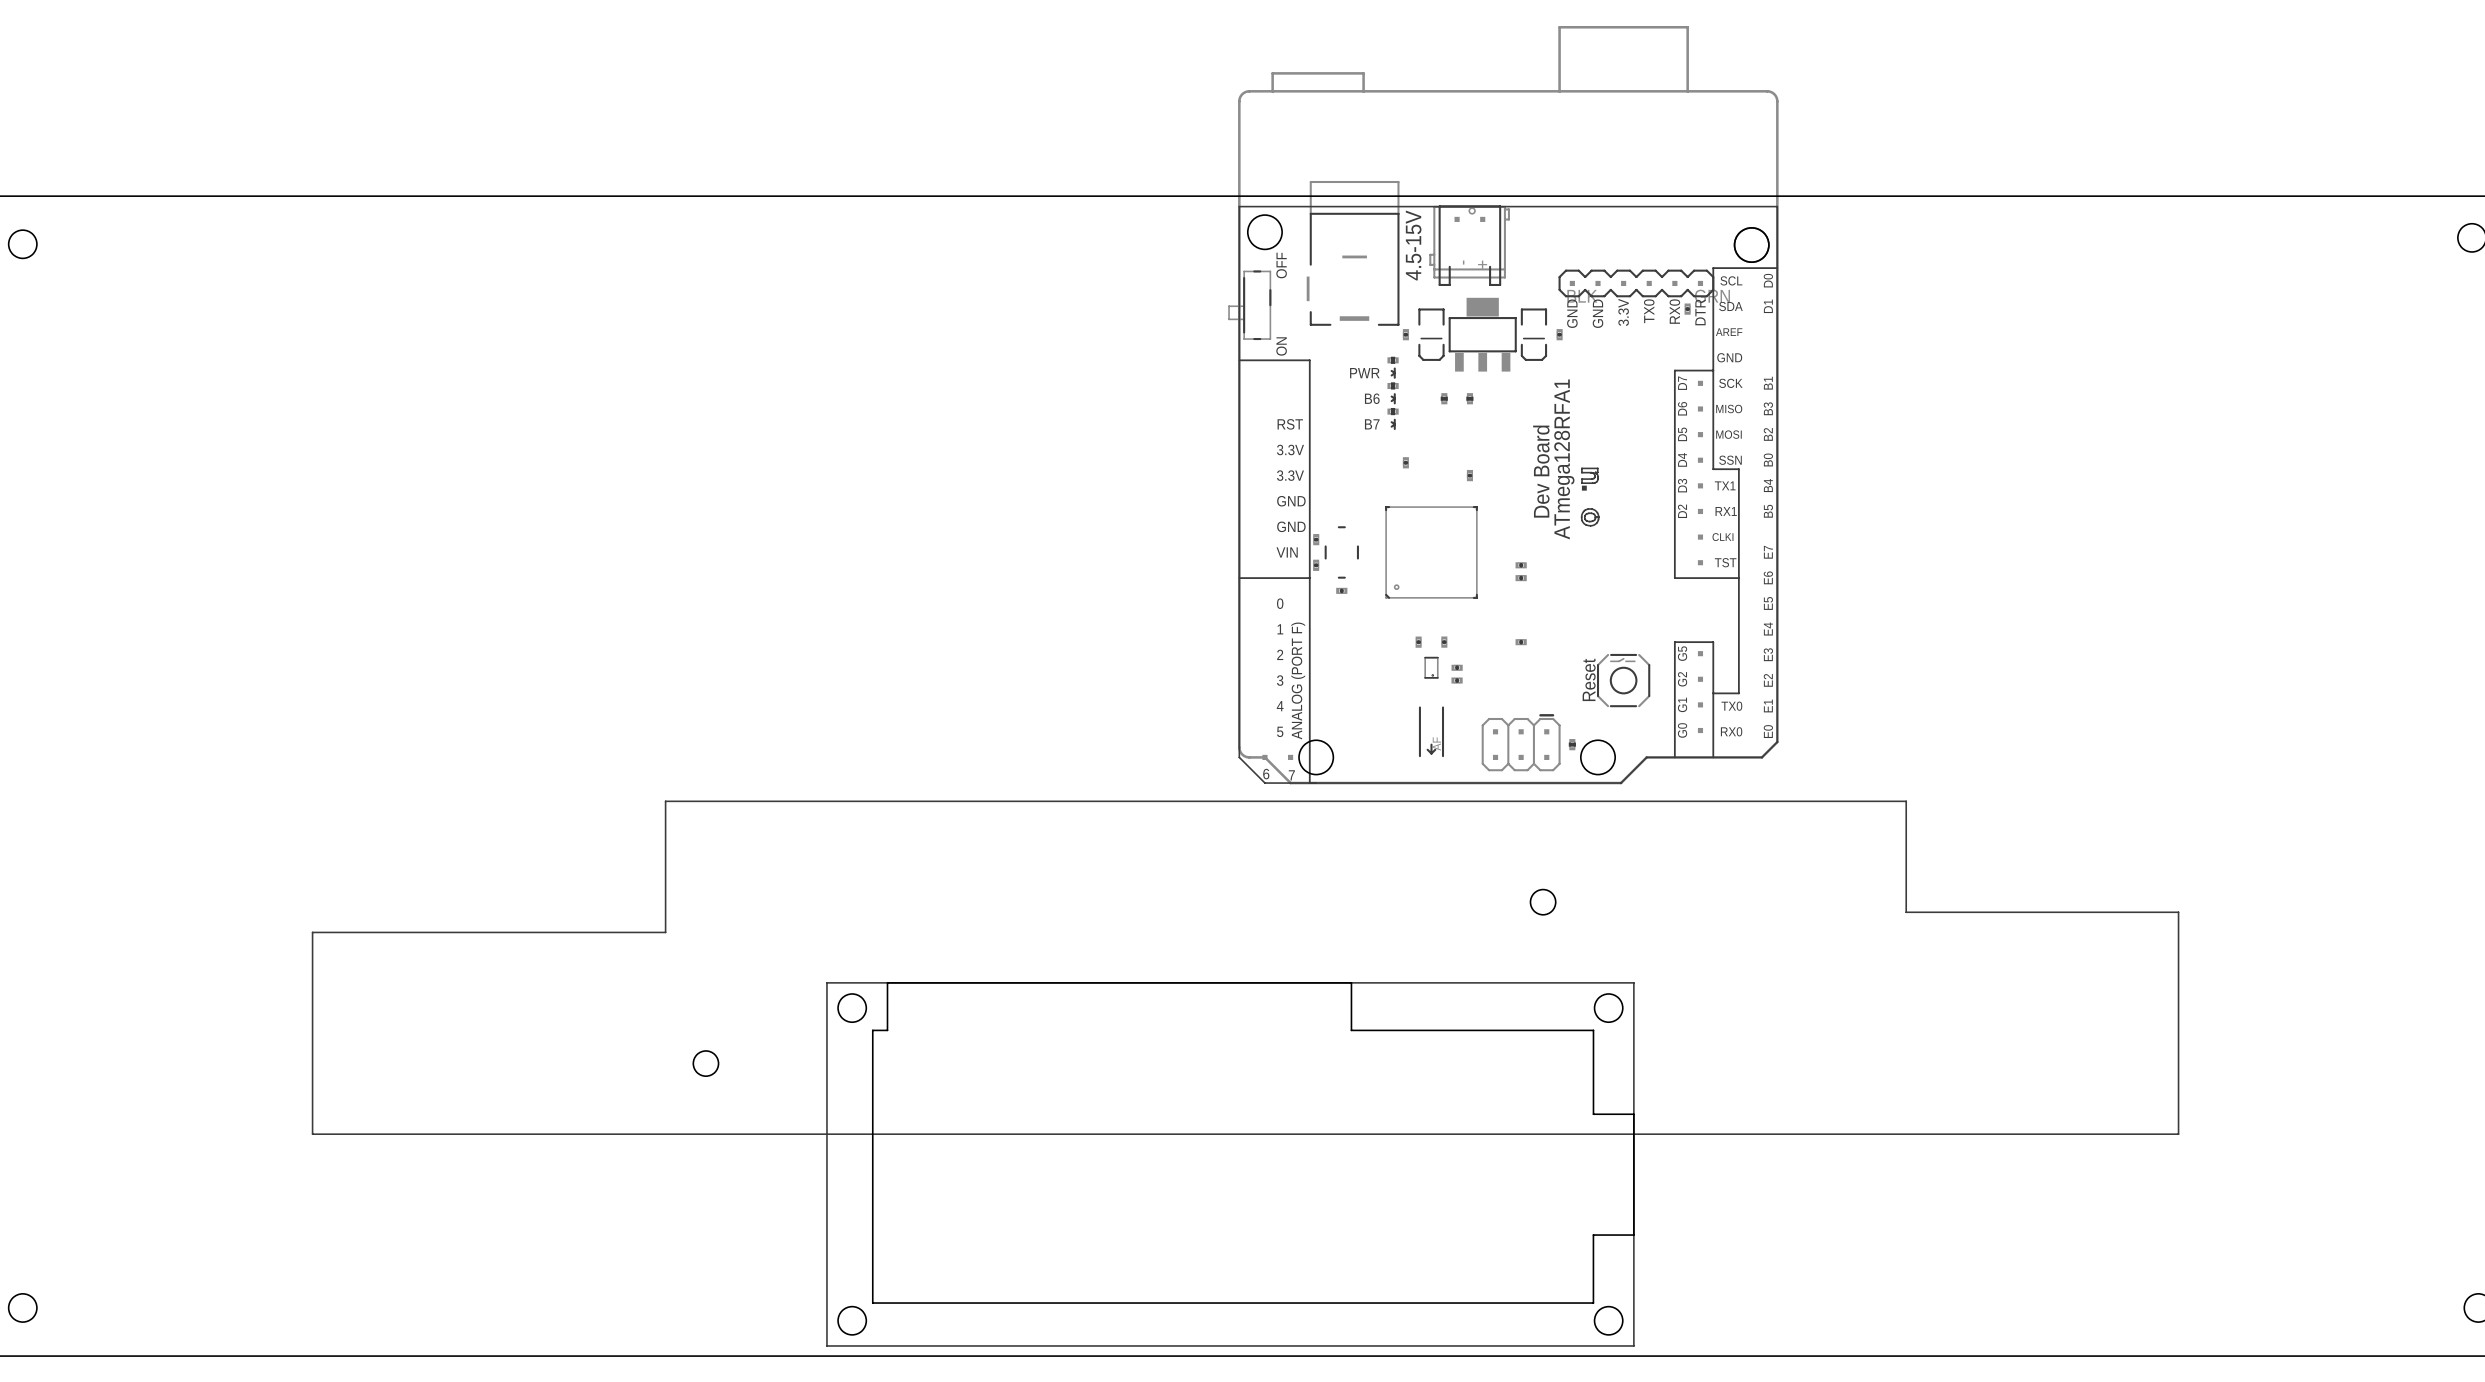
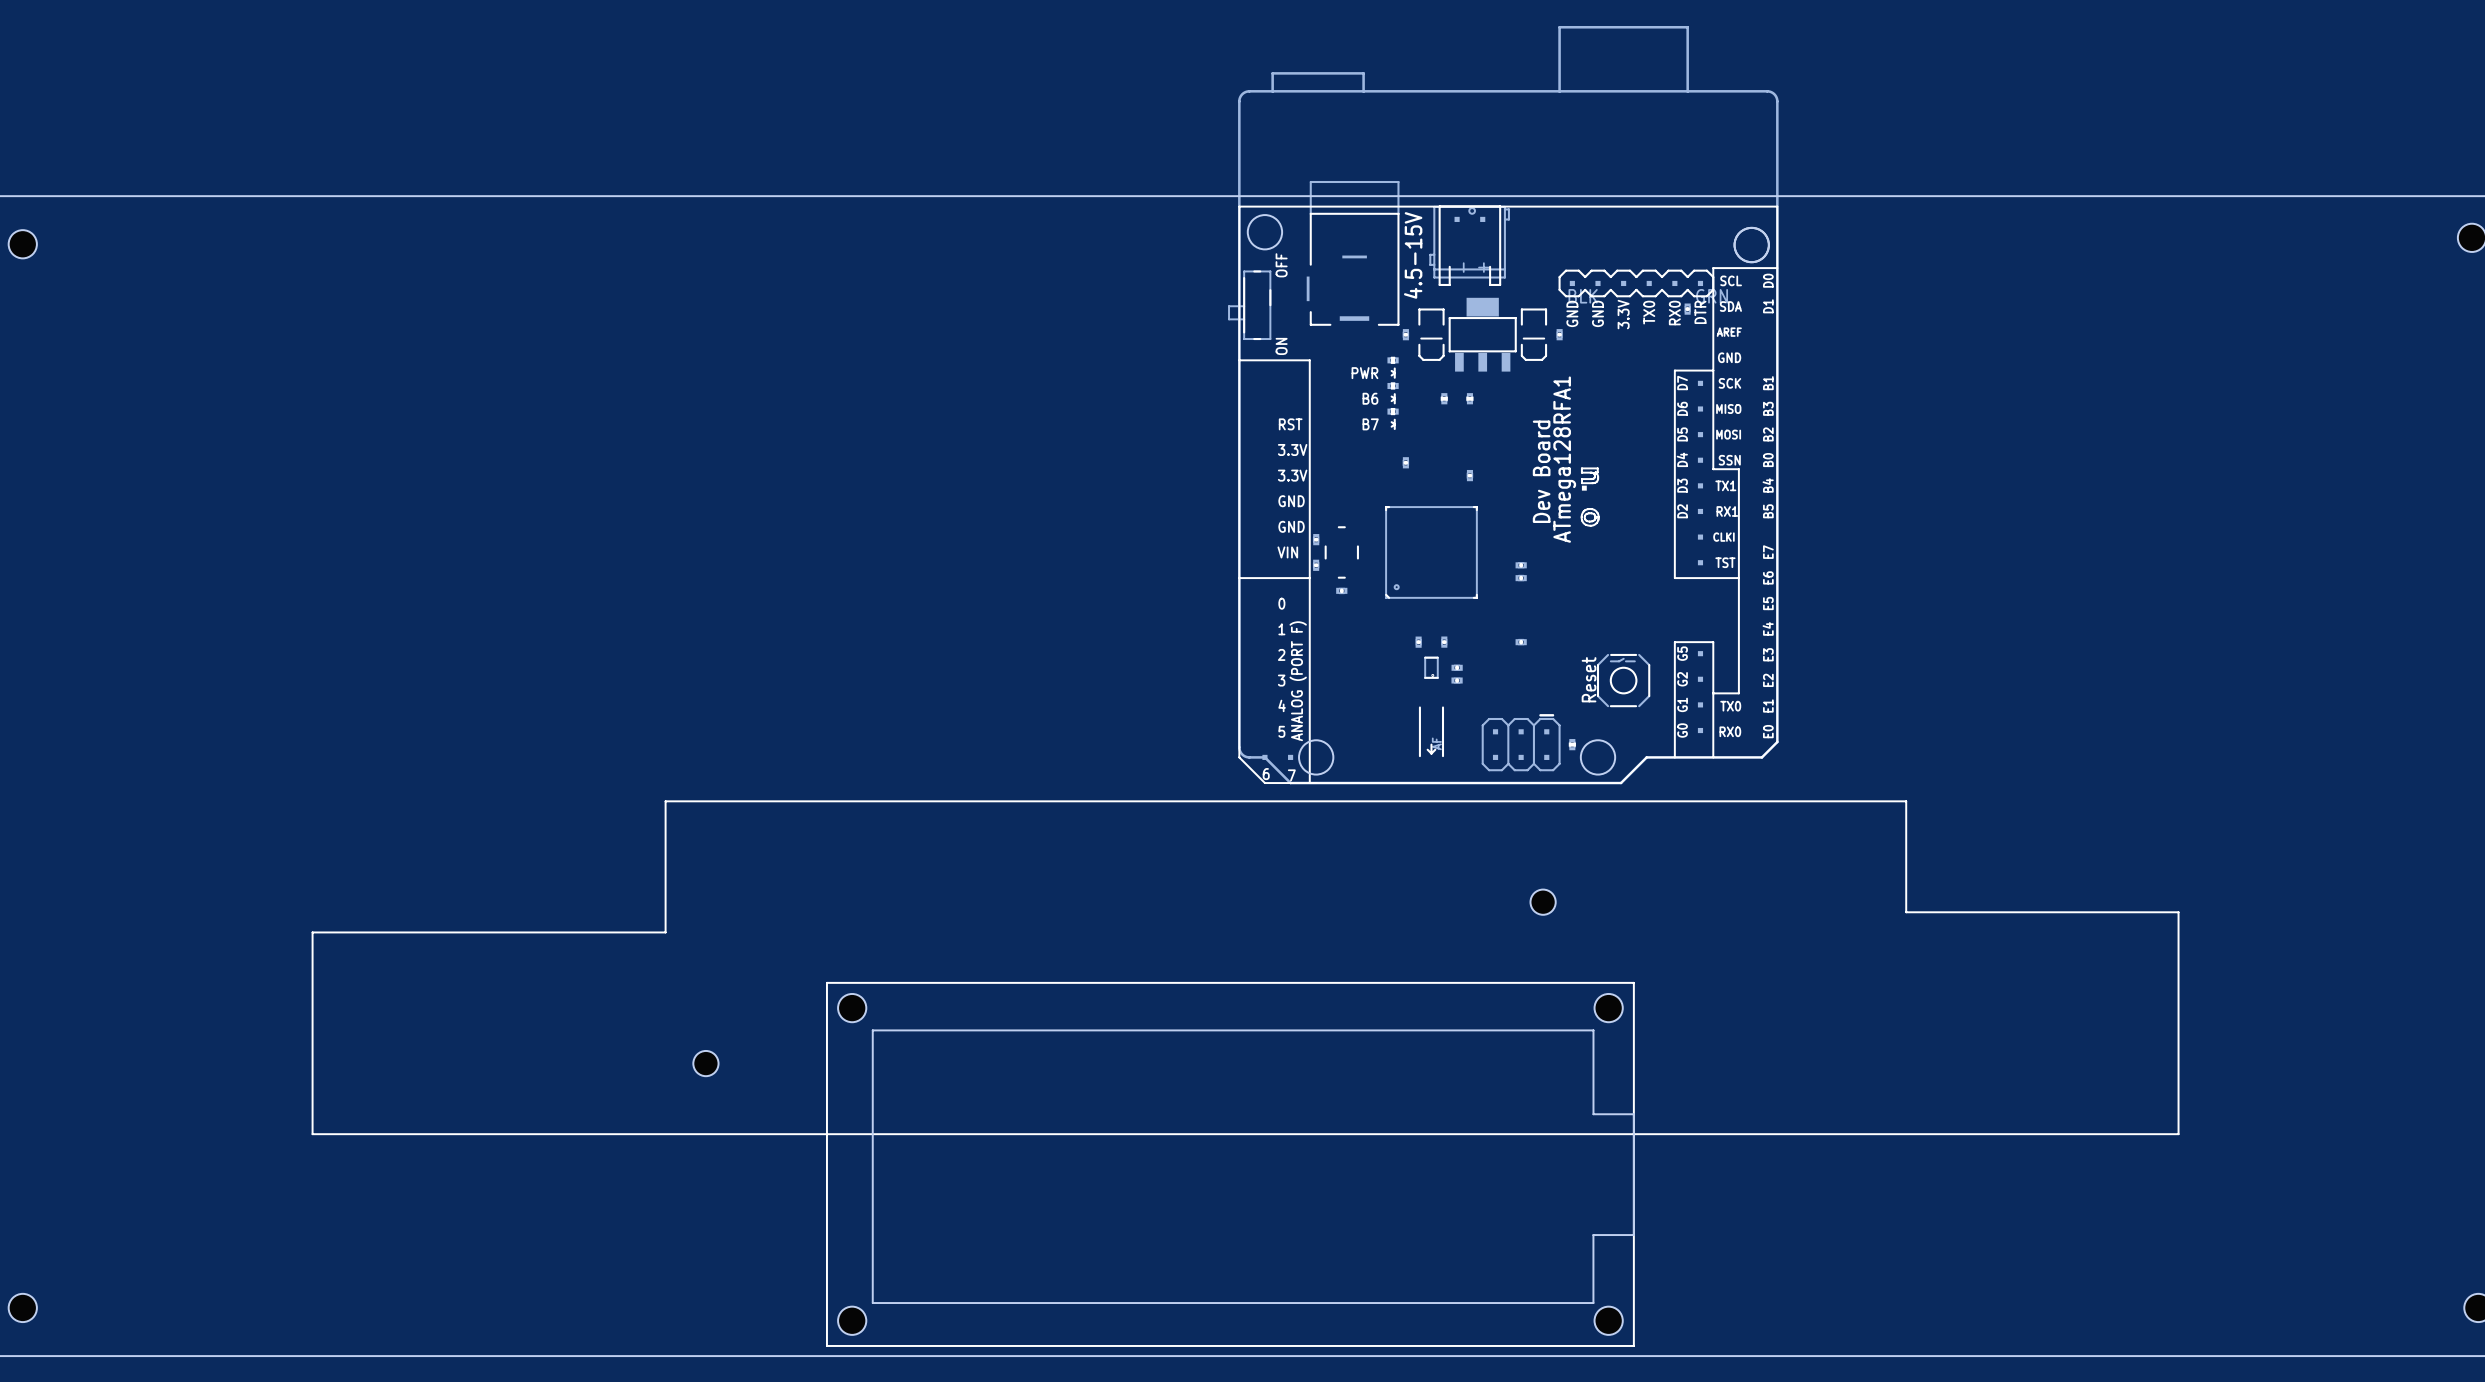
part footprint: [826, 982, 1634, 1346] -> [826, 982, 1634, 1346]

